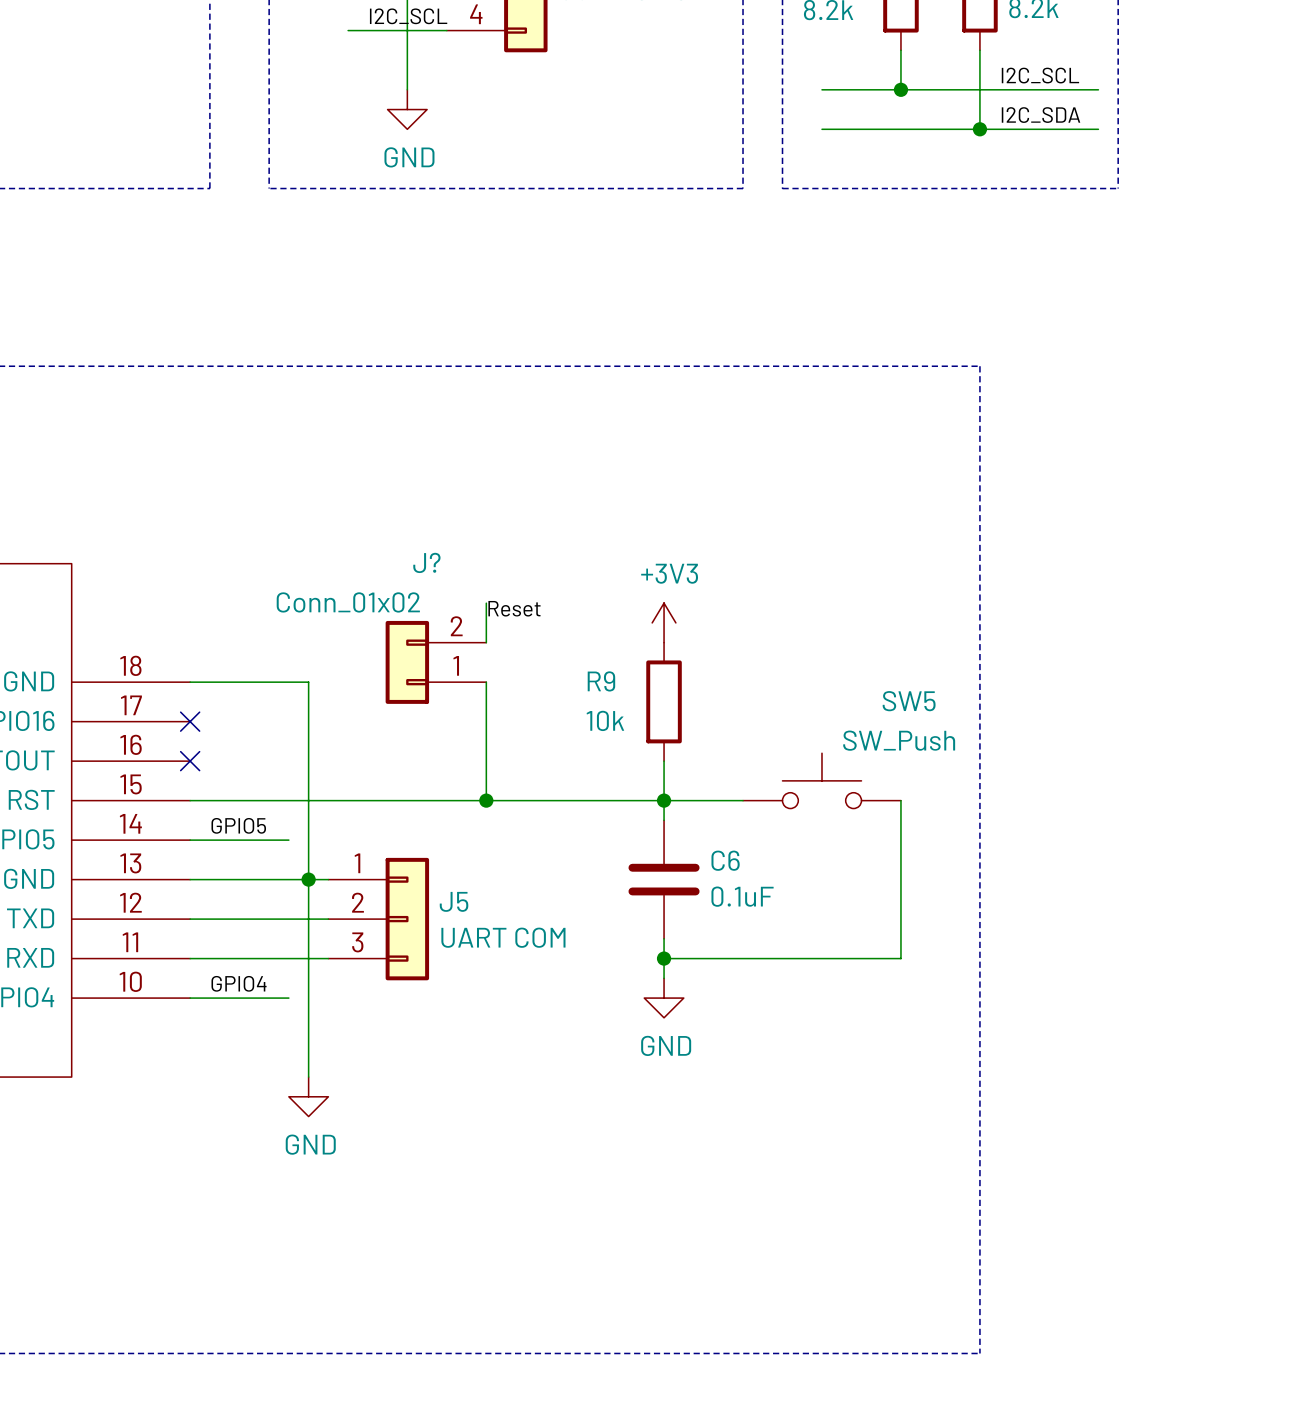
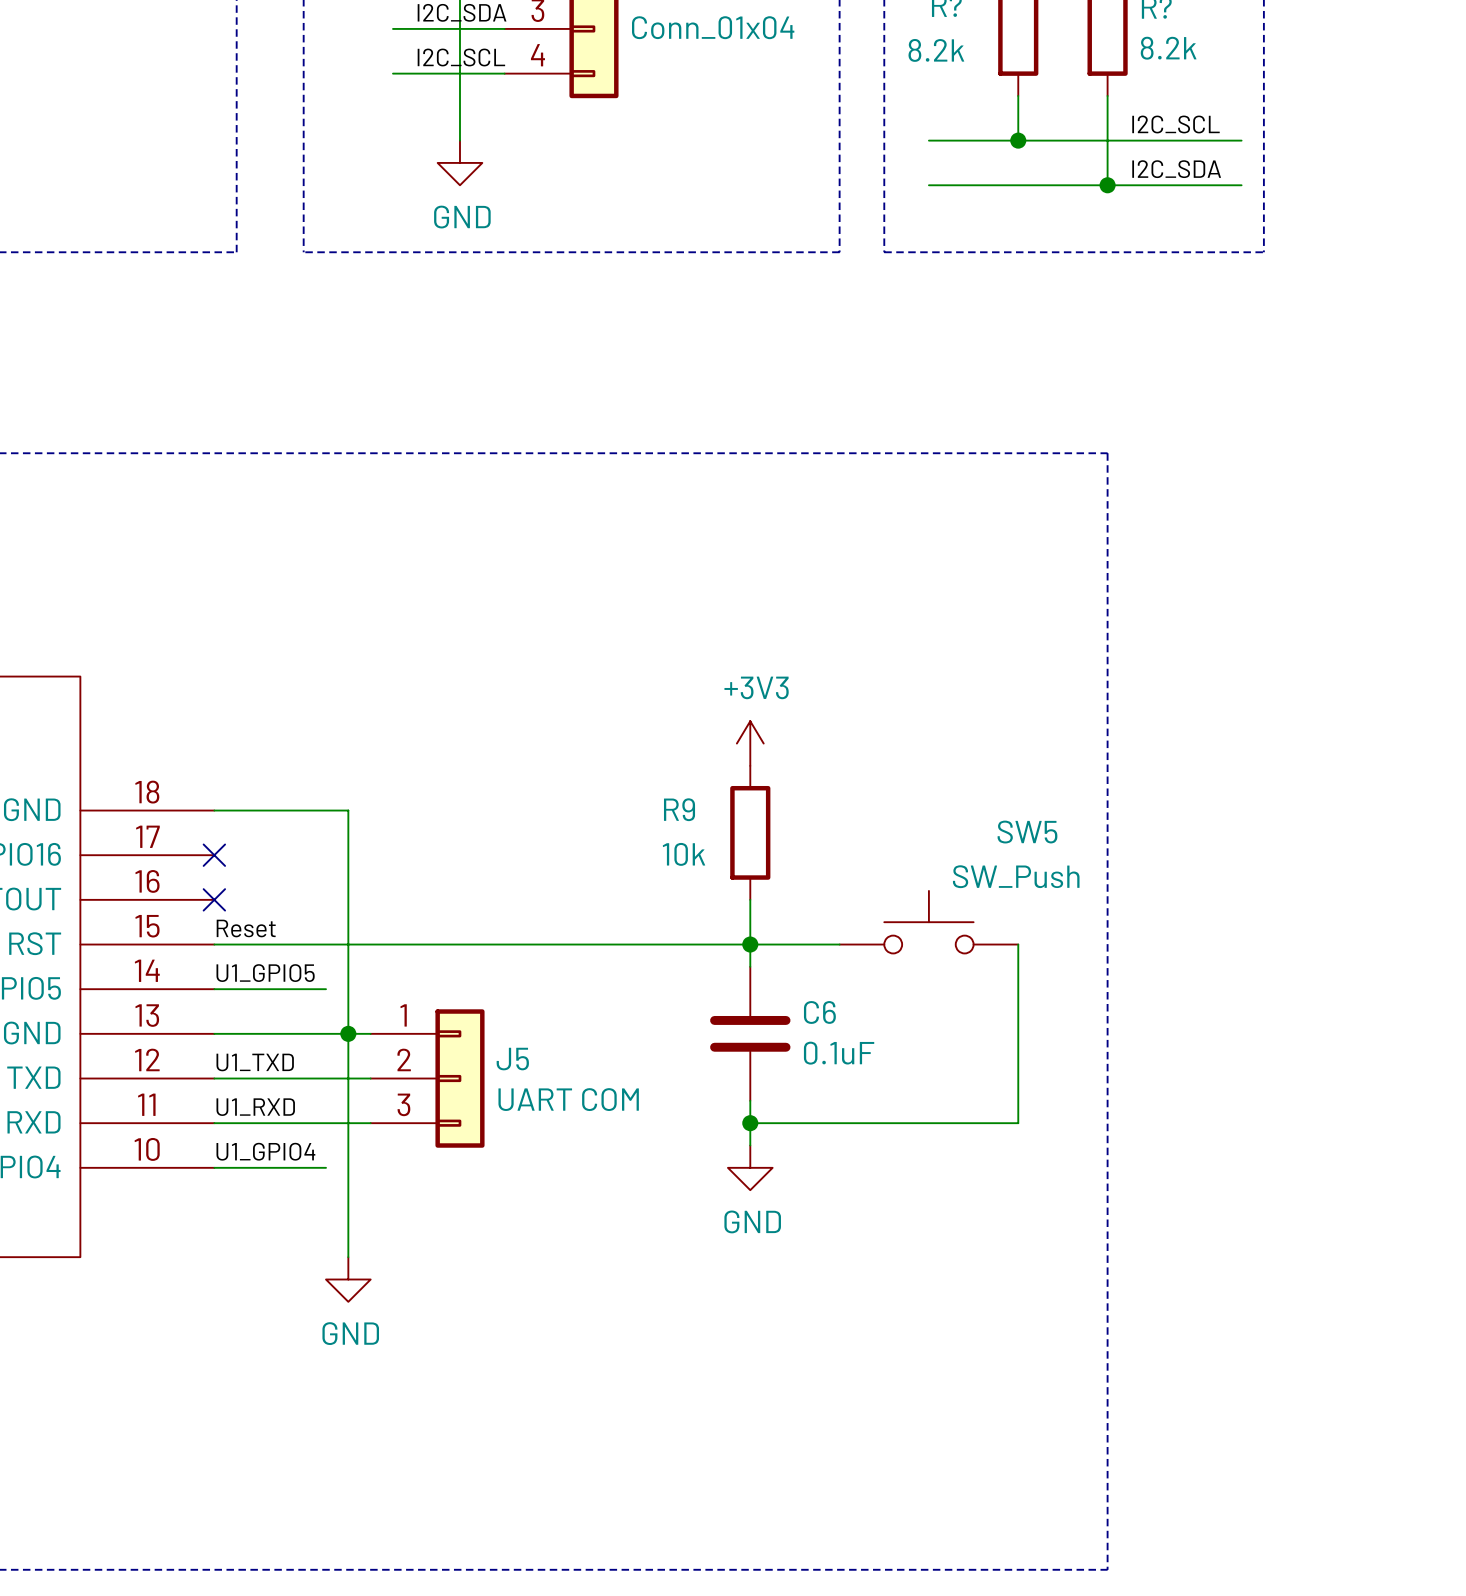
wire: (486, 603) (486, 642) -> none
label position: Reset (514, 608) -> Reset (246, 928)
J?: Conn_01x02 (435, 662) -> none
wire: (486, 682) (486, 800) -> none
junction: (486, 800) -> none
label: GPIO5 (238, 825) -> U1_GPIO5 (265, 973)
label: none -> U1_TXD (255, 1062)
label: none -> U1_RXD (255, 1107)
label: GPIO4 (239, 983) -> U1_GPIO4 (265, 1151)

